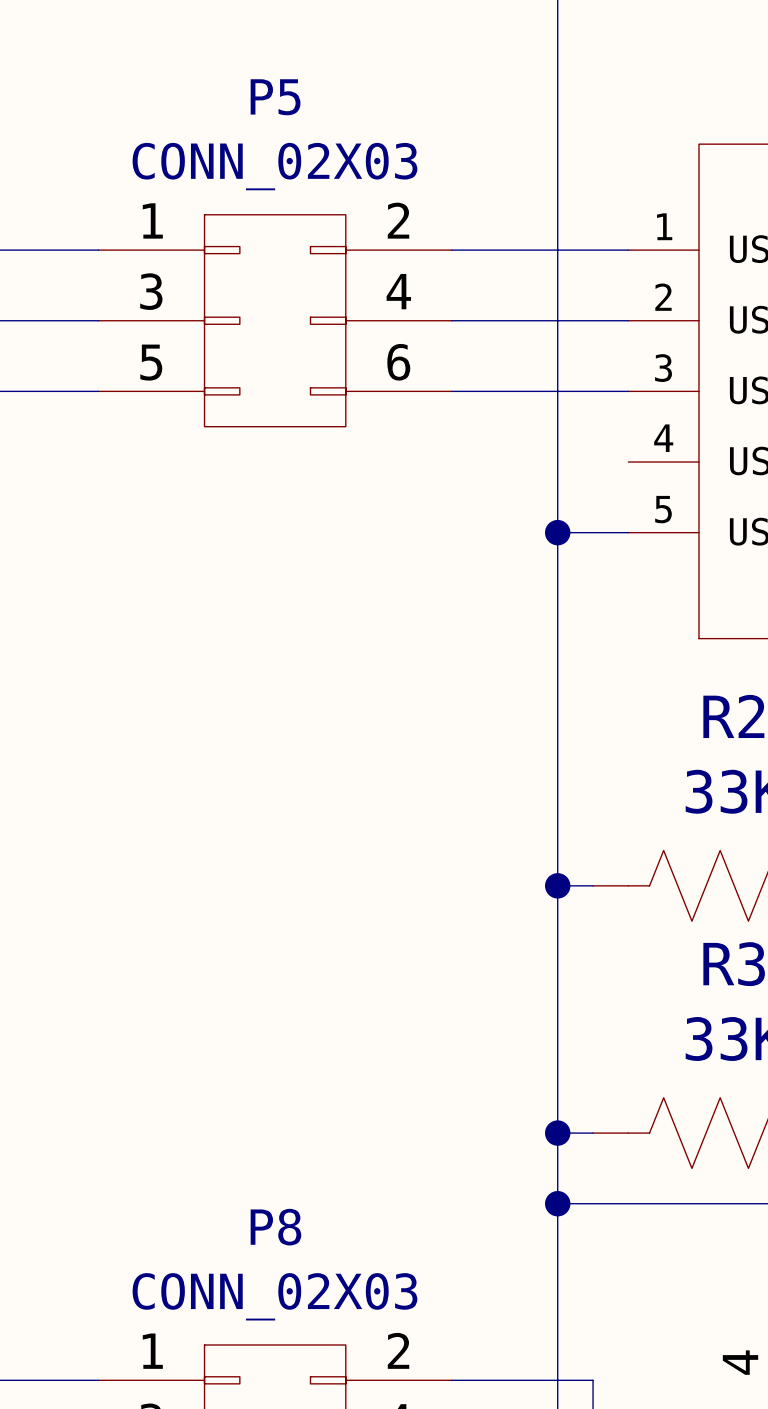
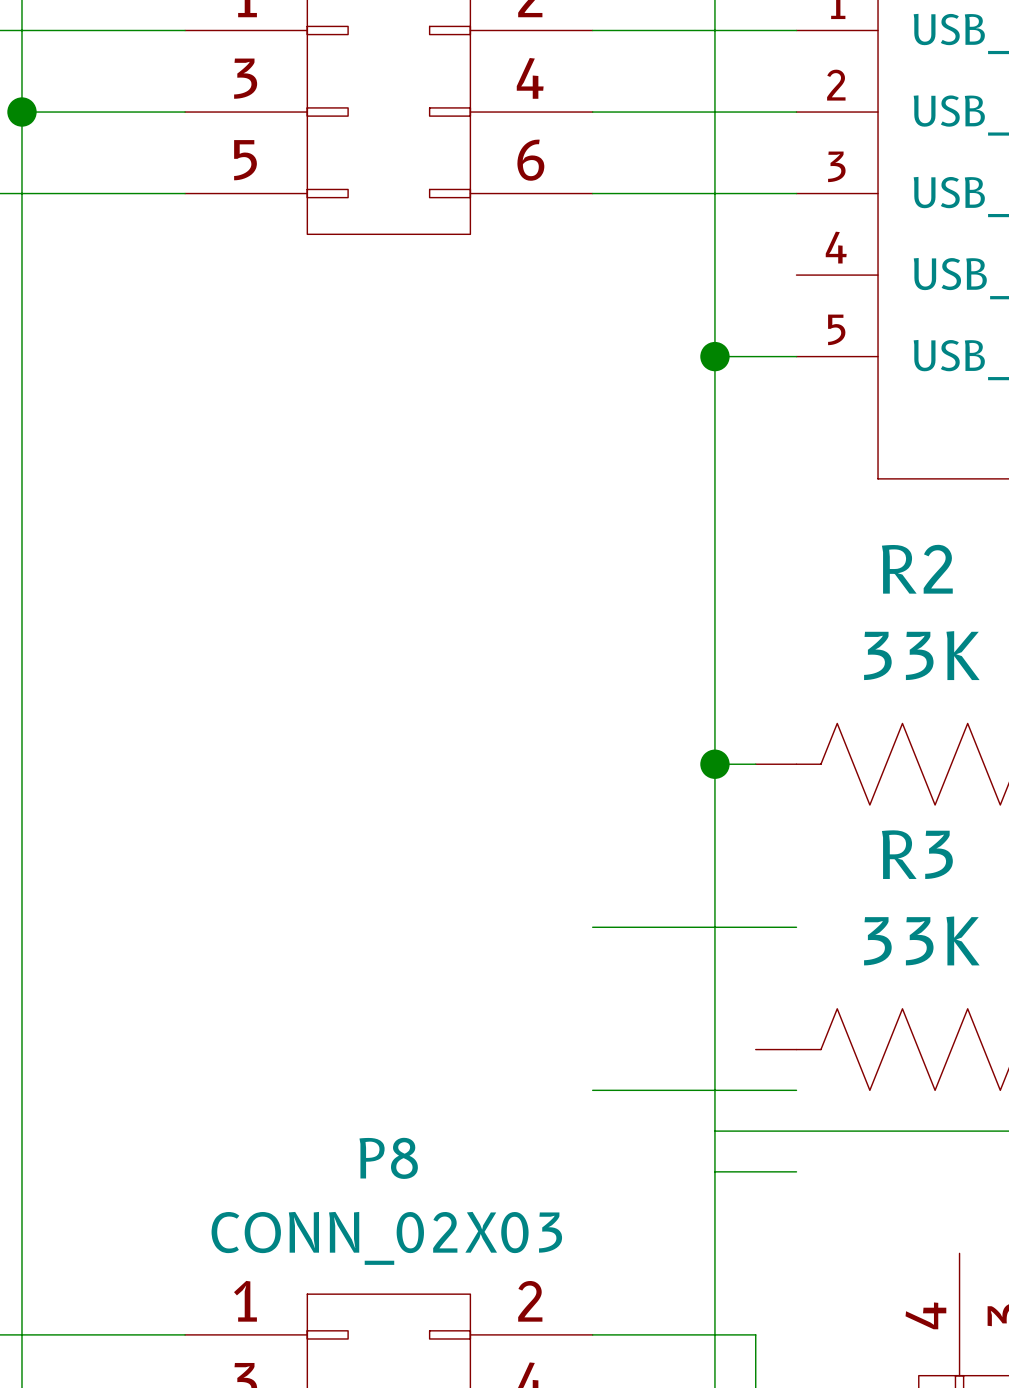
wire: none -> (592, 927) (796, 927)
wire: (557, 1133) (593, 1133) -> none
junction: (557, 1133) -> none
wire: none -> (592, 1090) (796, 1090)
junction: (557, 1203) -> none
wire: none -> (714, 1171) (796, 1171)

